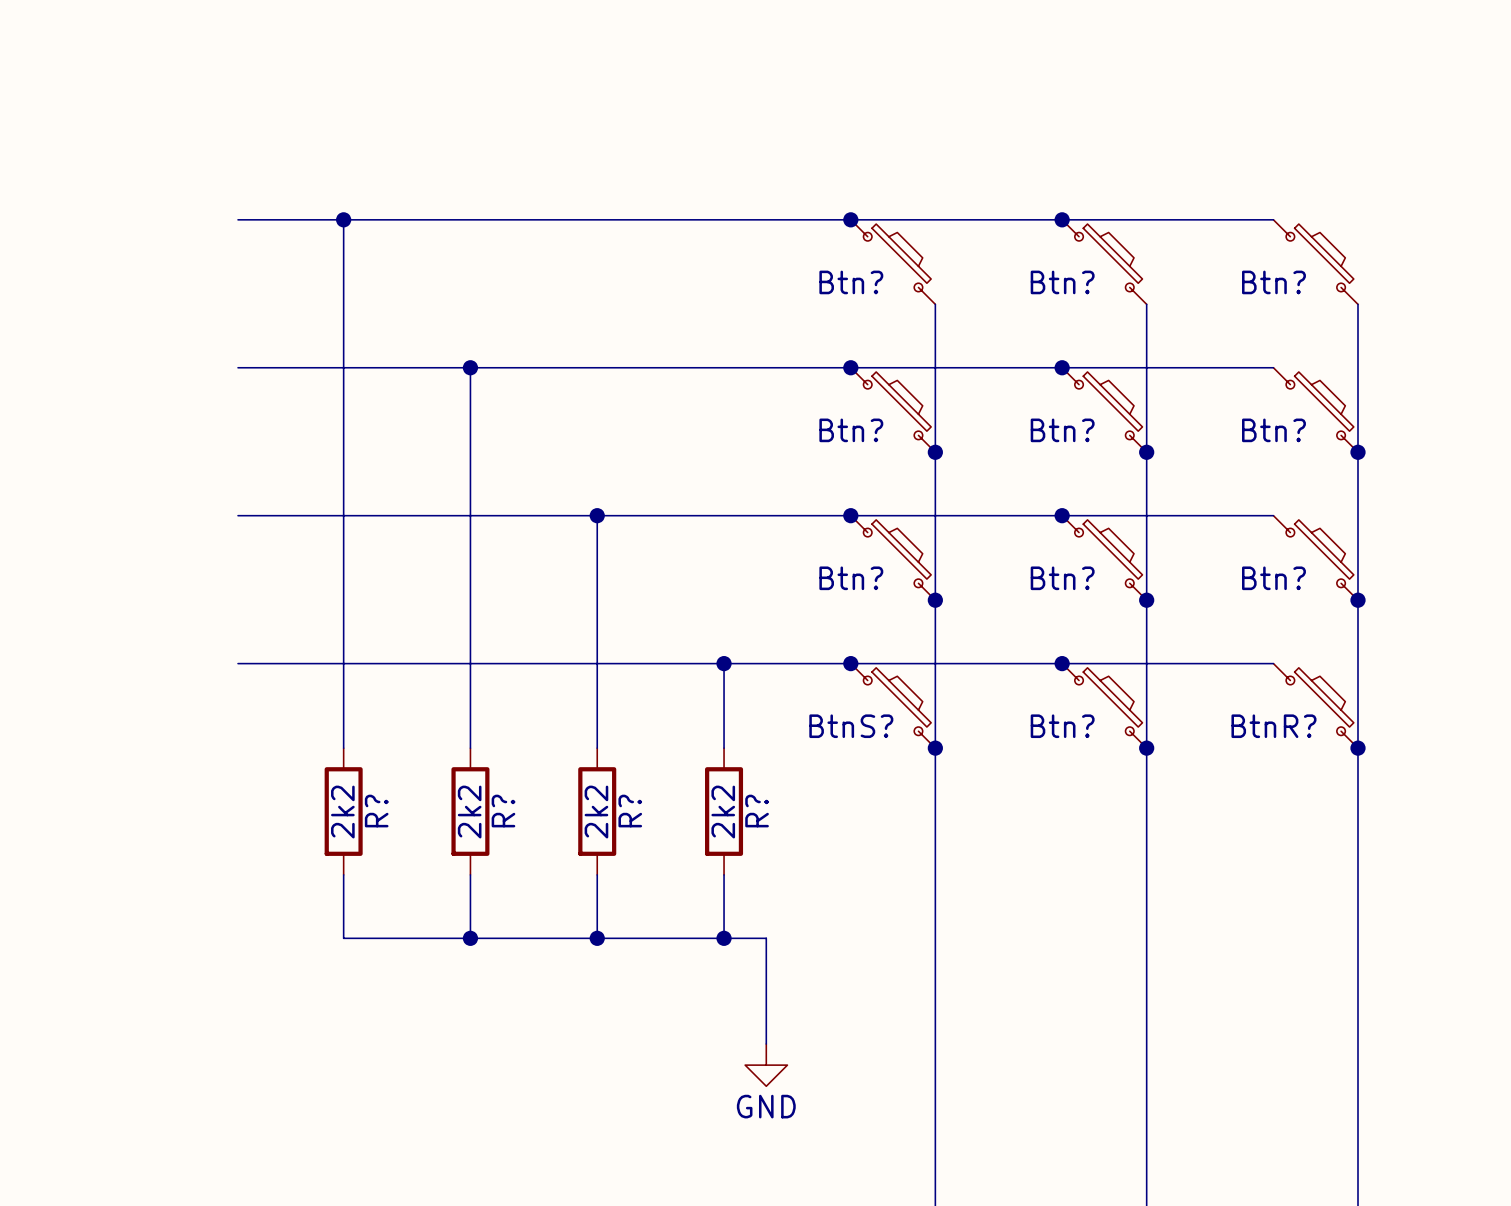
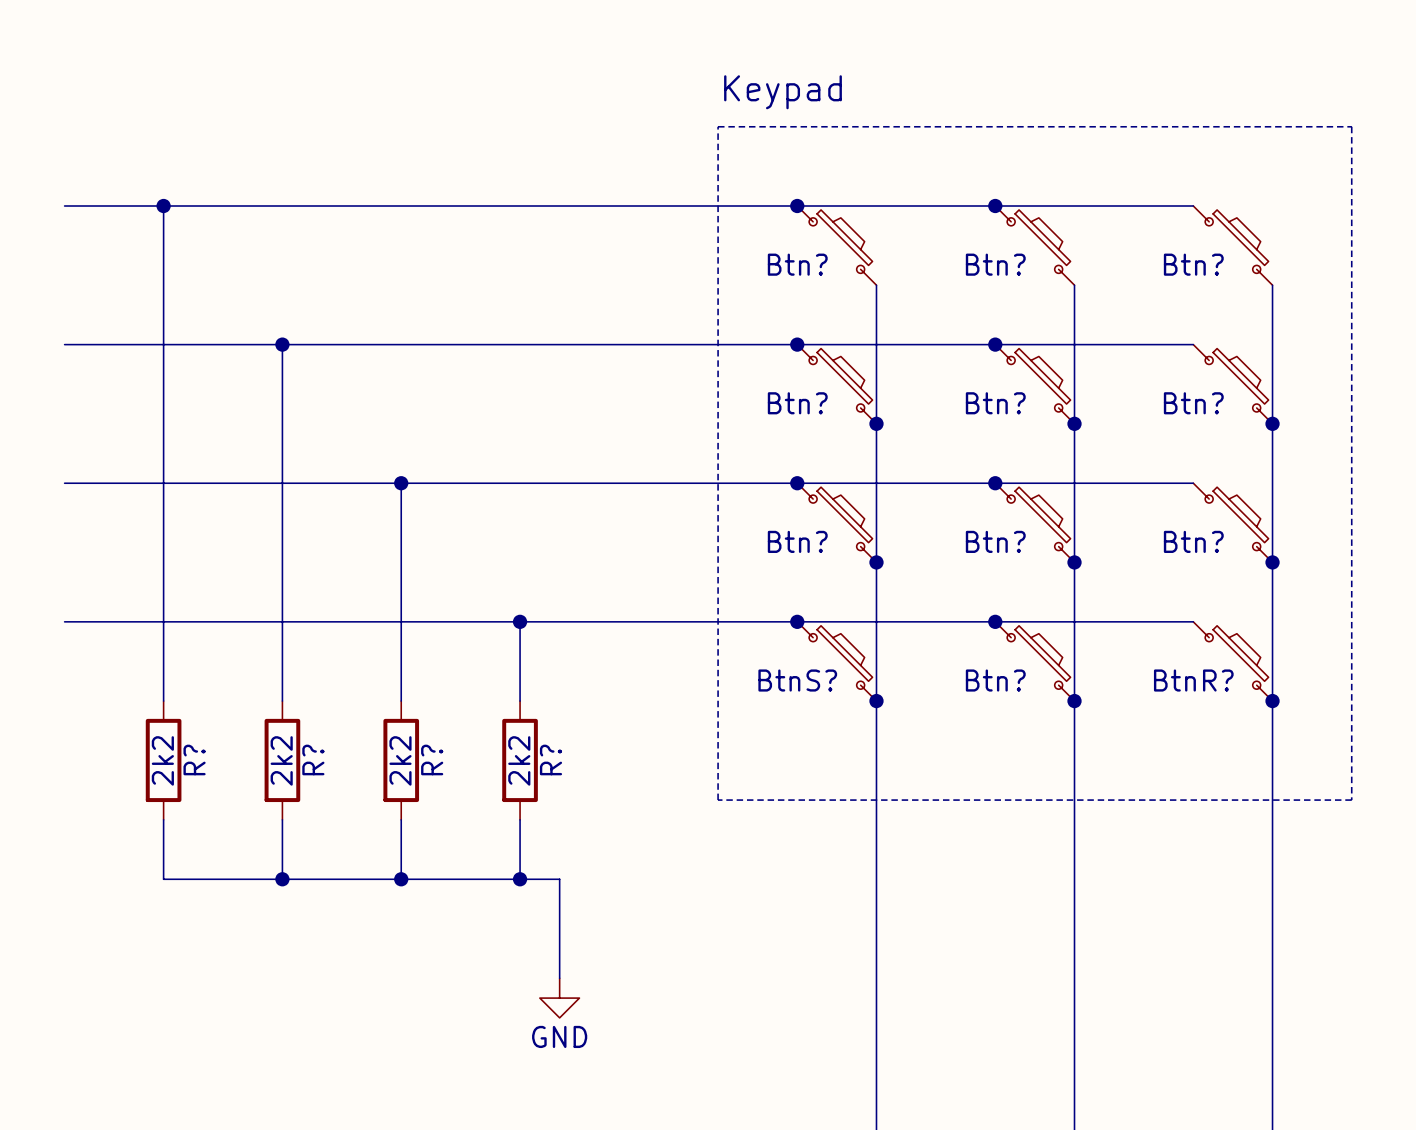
text: none -> Keypad (783, 92)
line: none -> (718, 126) (1351, 126) (1351, 800) (718, 800) (718, 126)
wire: none -> (64, 206) (223, 206)
junction: none -> (163, 206)
wire: (343, 219) (343, 748) -> (163, 206) (163, 701)
junction: (343, 219) -> none
wire: none -> (64, 344) (223, 344)
junction: none -> (282, 344)
wire: (470, 367) (470, 748) -> (282, 344) (282, 701)
junction: (470, 367) -> none
wire: none -> (64, 483) (223, 483)
junction: none -> (401, 483)
wire: (597, 515) (597, 748) -> (401, 483) (401, 701)
junction: (597, 515) -> none
wire: none -> (64, 621) (223, 621)
junction: none -> (520, 621)
wire: (724, 663) (724, 748) -> (520, 621) (520, 701)
junction: (724, 663) -> none
R?: none -> 2k2 (163, 760)
R?: none -> 2k2 (282, 760)
R?: 2k2 (343, 811) -> none
R?: none -> 2k2 (401, 760)
R?: 2k2 (470, 811) -> none
R?: none -> 2k2 (520, 760)
R?: 2k2 (597, 811) -> none
R?: 2k2 (724, 811) -> none
wire: (343, 874) (343, 938) -> (163, 819) (163, 879) (322, 879)
wire: none -> (401, 819) (401, 879)
wire: (470, 874) (470, 938) -> (282, 819) (282, 879)
wire: (597, 874) (597, 938) (766, 938) (766, 1043) -> none
wire: (724, 874) (724, 938) -> (520, 819) (520, 879)
junction: none -> (282, 879)
junction: none -> (401, 879)
junction: (470, 938) -> none
junction: none -> (520, 879)
wire: none -> (559, 879) (559, 978)
junction: (597, 938) -> none
junction: (724, 938) -> none
power symbol position: GND (766, 1065) -> GND (559, 998)

